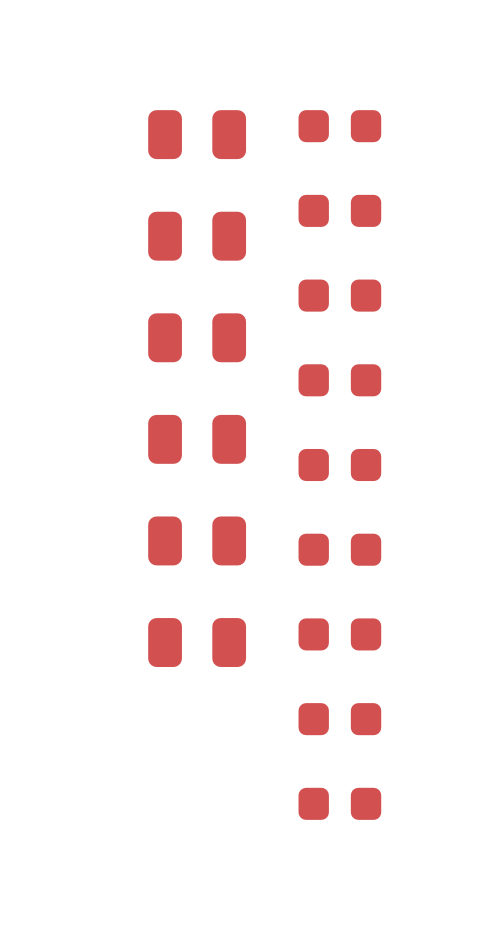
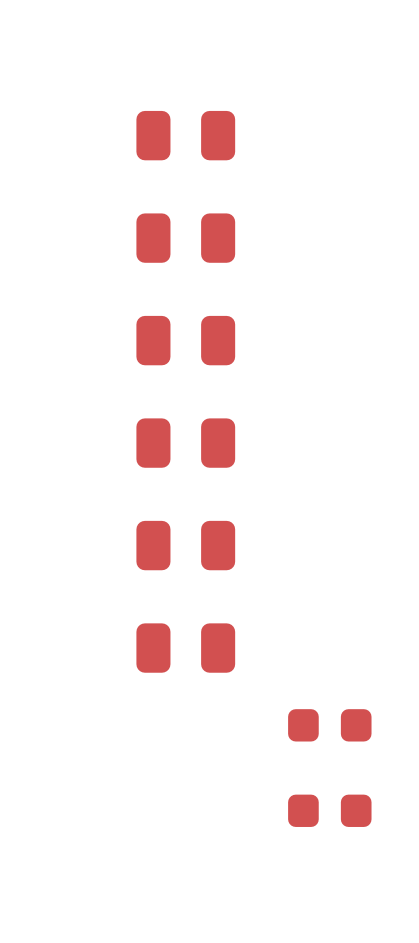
part: (339, 126) -> none
part: (339, 210) -> none
part: (339, 295) -> none
part: (339, 380) -> none
part: (339, 465) -> none
part: (339, 549) -> none
part: (339, 634) -> none

